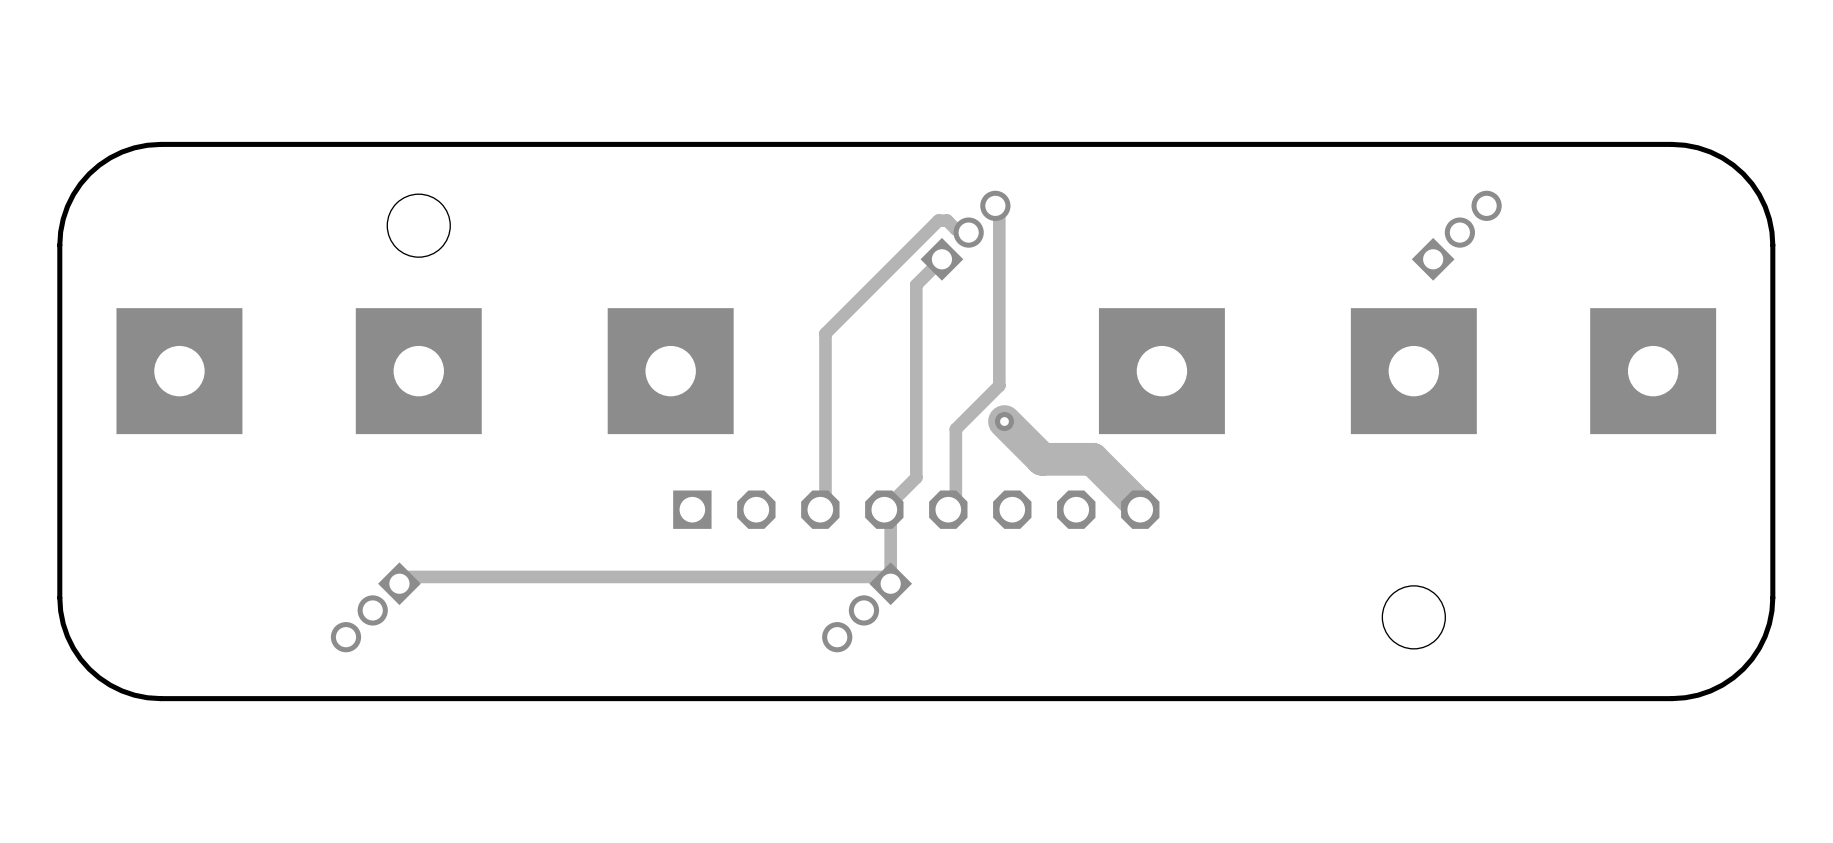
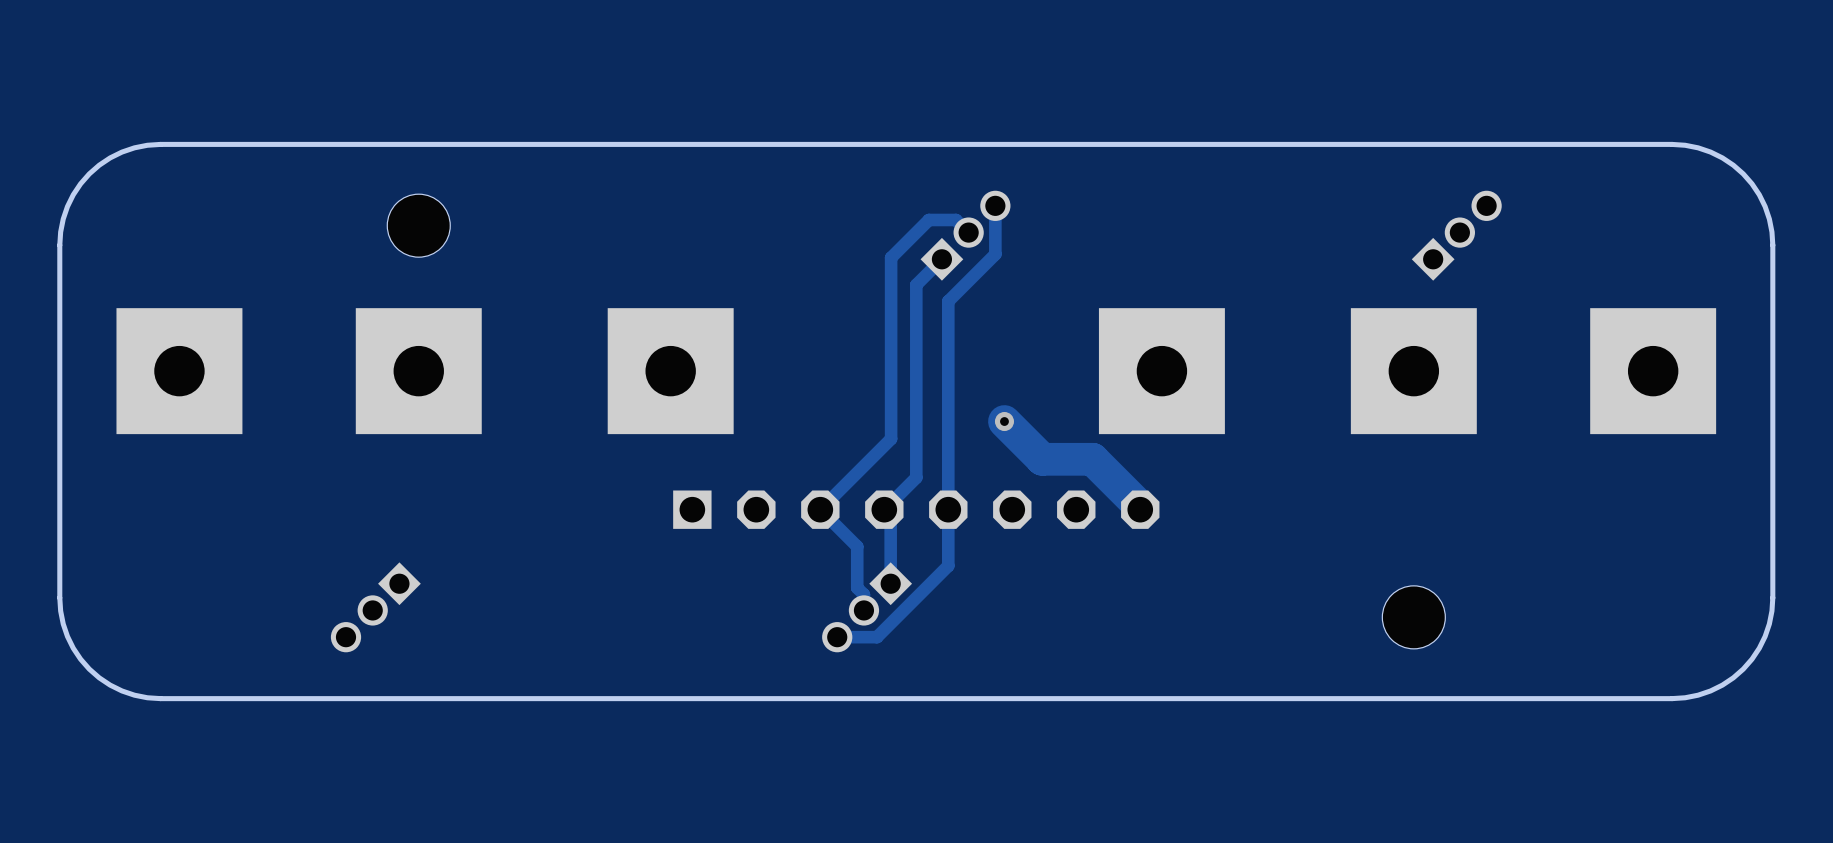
track: (995, 205) (999, 211) (999, 385) (955, 429) (955, 507) (948, 509) -> (995, 205) (995, 254) (948, 301) (948, 565) (876, 637) (837, 637)
track: (968, 232) (964, 229) (955, 229) (947, 220) (938, 220) (825, 333) (825, 507) (820, 509) -> (968, 232) (956, 219) (928, 219) (891, 257) (891, 438) (820, 509) (857, 546) (857, 587) (863, 594) (863, 610)
track: (890, 583) (886, 576) (399, 576) (399, 583) -> none

